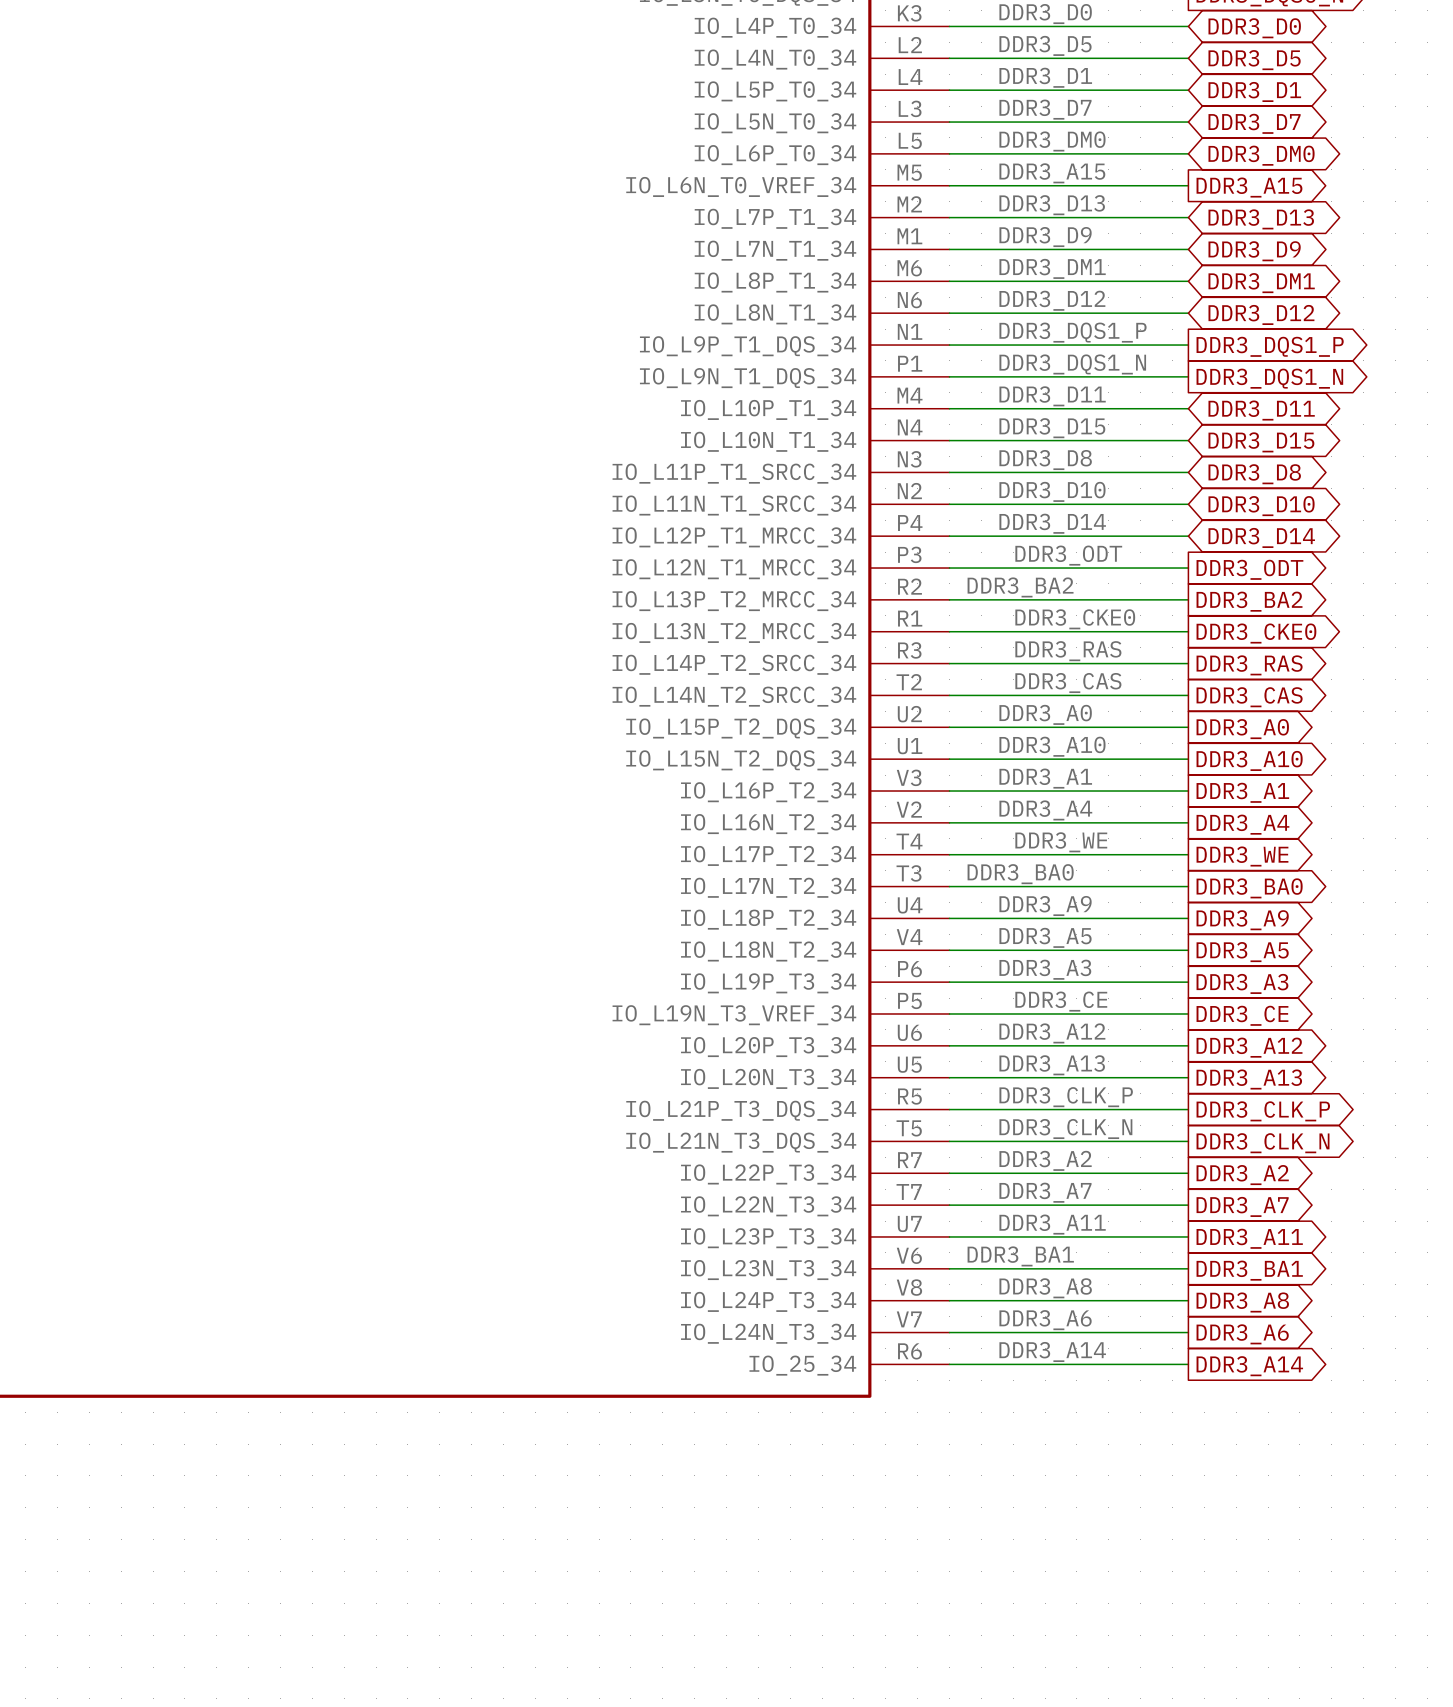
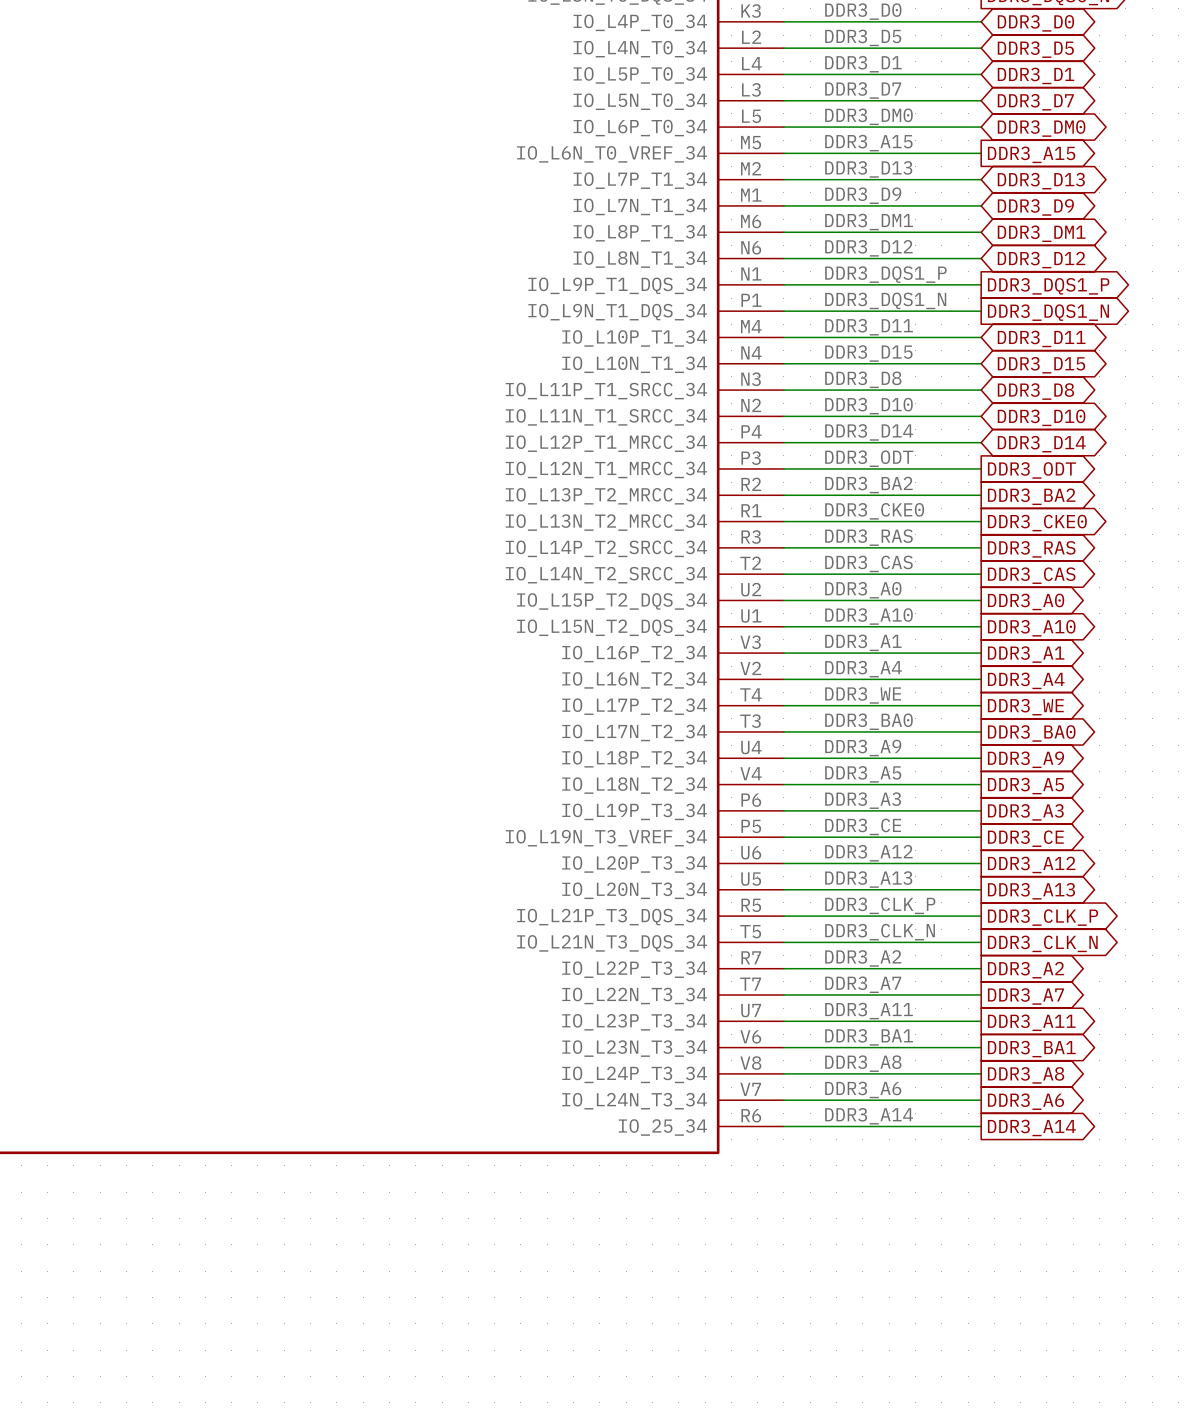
label position: DDR3_ODT (1068, 555) -> DDR3_ODT (869, 458)
label position: DDR3_BA2 (1020, 587) -> DDR3_BA2 (868, 485)
label position: DDR3_CKE0 (1075, 619) -> DDR3_CKE0 (874, 511)
label position: DDR3_RAS (1068, 651) -> DDR3_RAS (868, 537)
label position: DDR3_CAS (1068, 683) -> DDR3_CAS (868, 563)
label position: DDR3_WE (1061, 842) -> DDR3_WE (863, 695)
label position: DDR3_BA0 (1020, 874) -> DDR3_BA0 (868, 721)
label position: DDR3_CE (1061, 1001) -> DDR3_CE (863, 826)
label position: DDR3_BA1 (1020, 1256) -> DDR3_BA1 (869, 1037)

